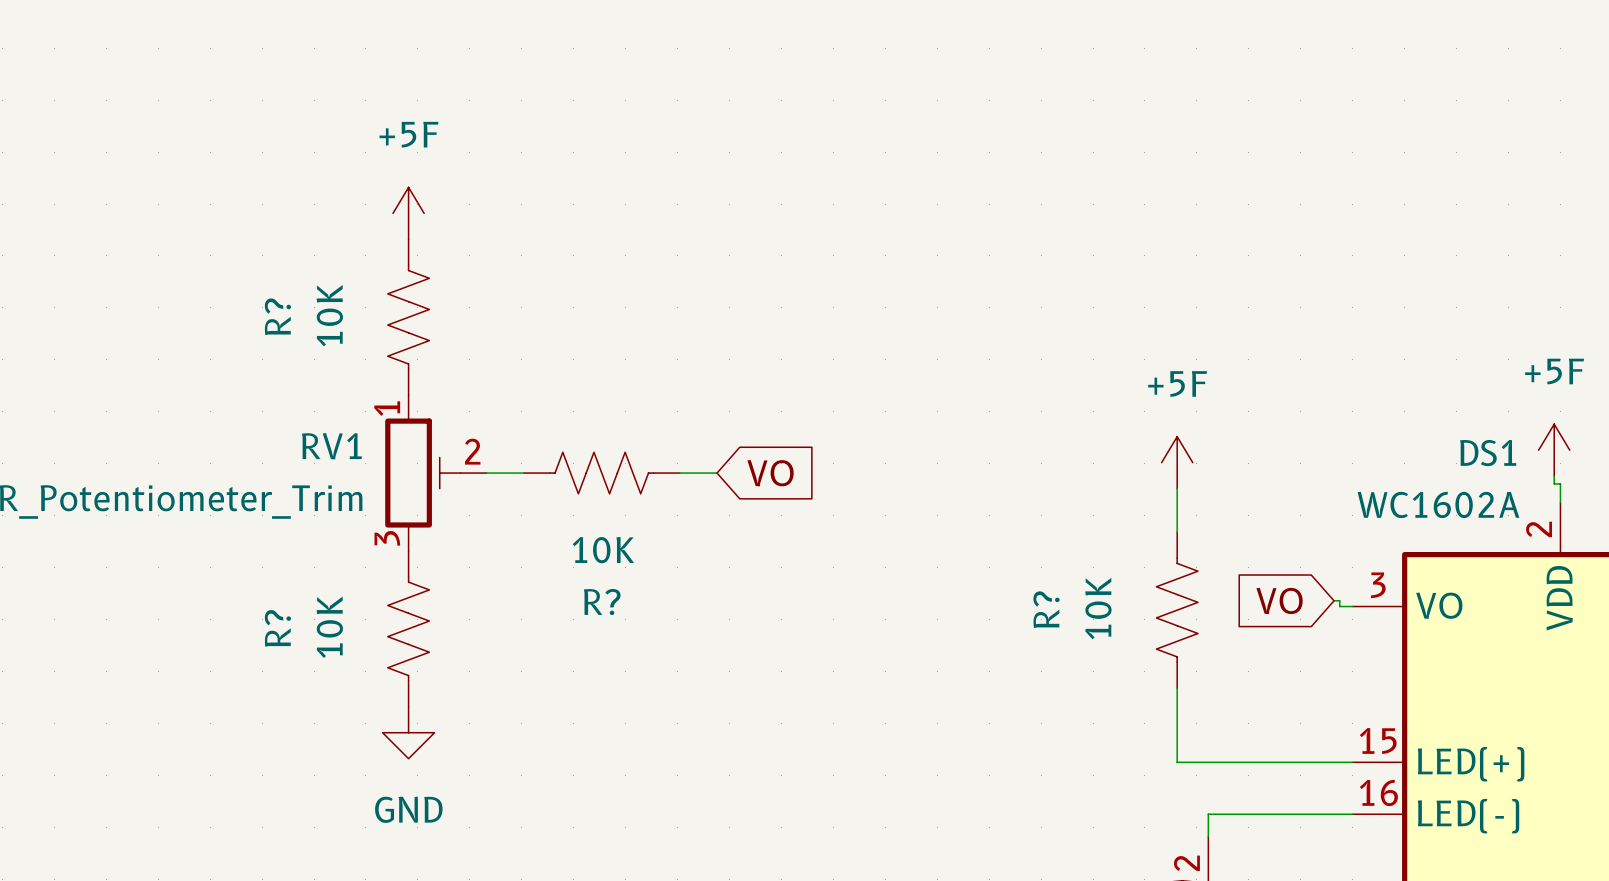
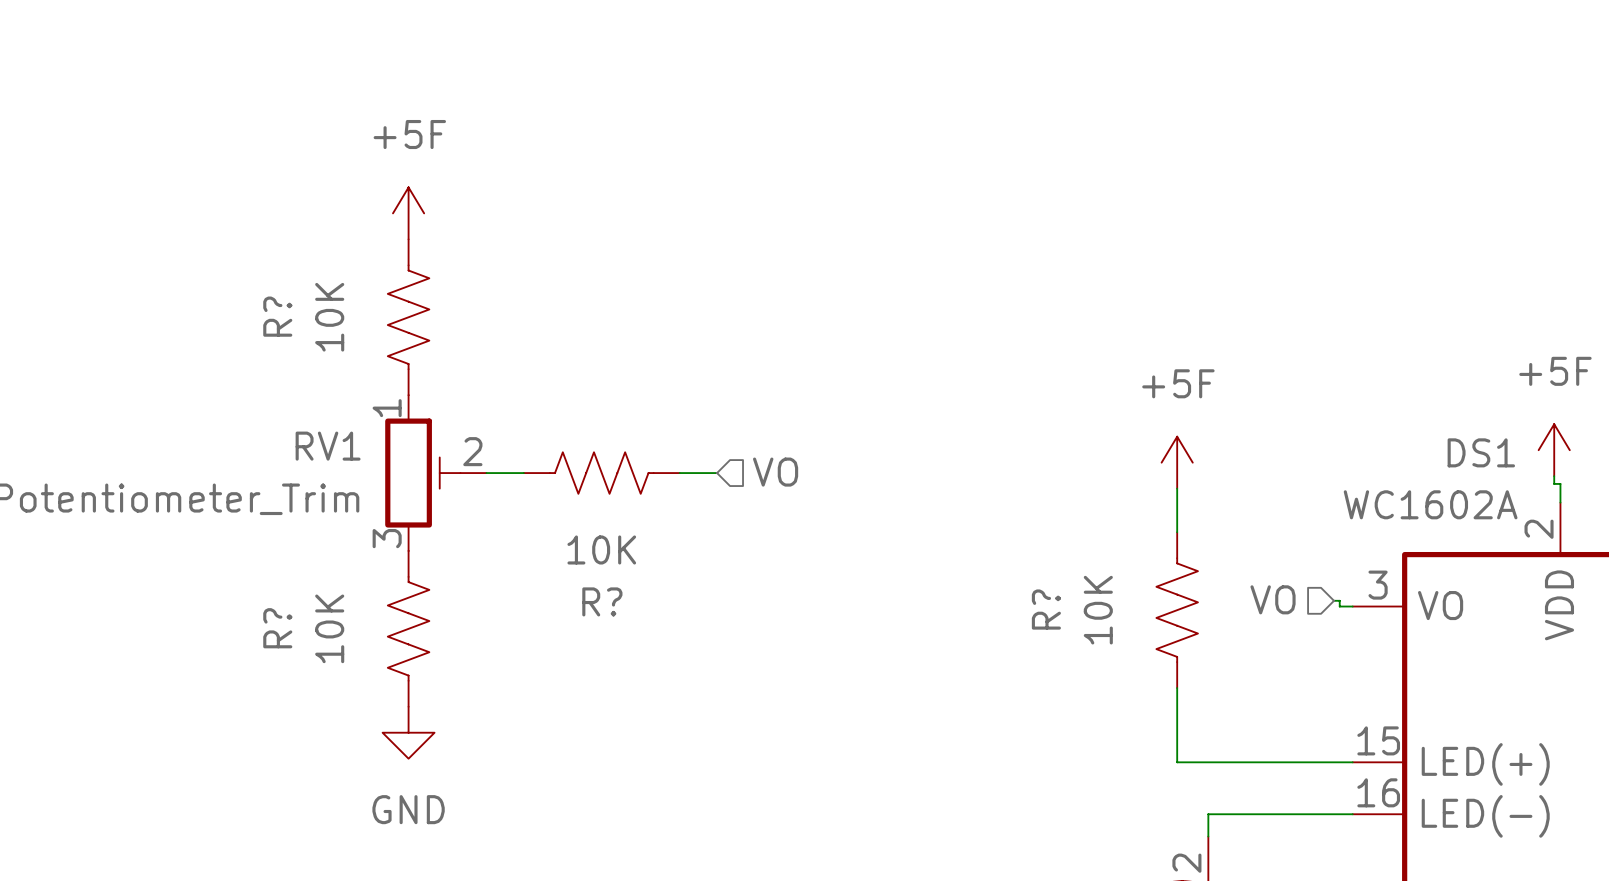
hierarchical label: none -> VO (775, 472)
global label: VO (770, 473) -> none
hierarchical label: none -> VO (1273, 599)
global label: VO (1279, 600) -> none

